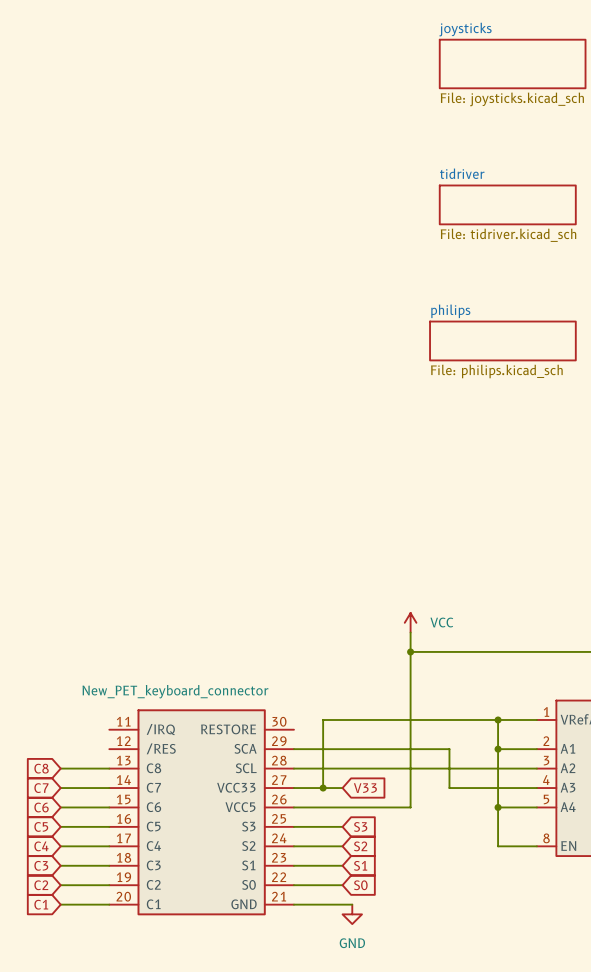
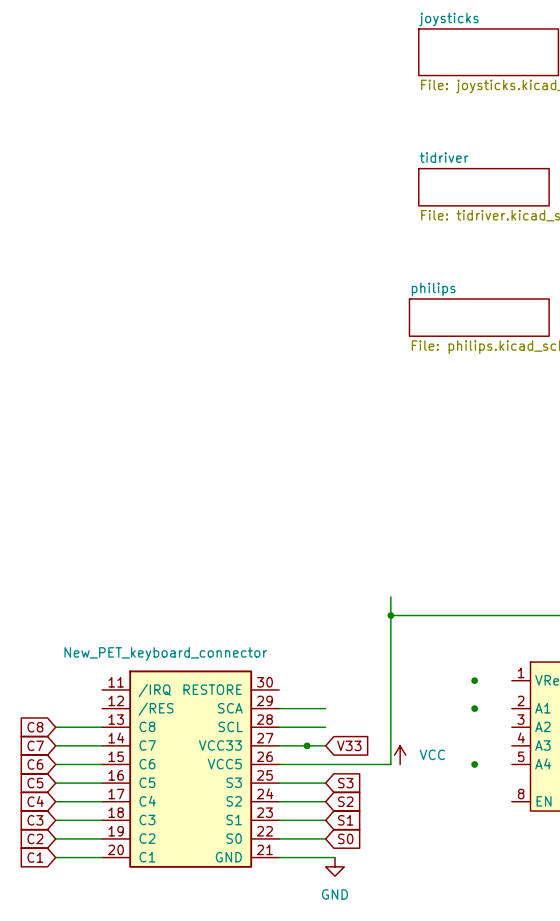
power symbol position: VCC (410, 622) -> VCC (400, 755)
wire: (498, 719) (498, 846) (536, 846) -> none
wire: (536, 719) (323, 719) (323, 788) -> none
wire: (342, 749) (449, 749) (449, 788) (536, 788) -> none
wire: (498, 749) (536, 749) -> none
wire: (342, 768) (536, 768) -> none
wire: (498, 807) (536, 807) -> none

